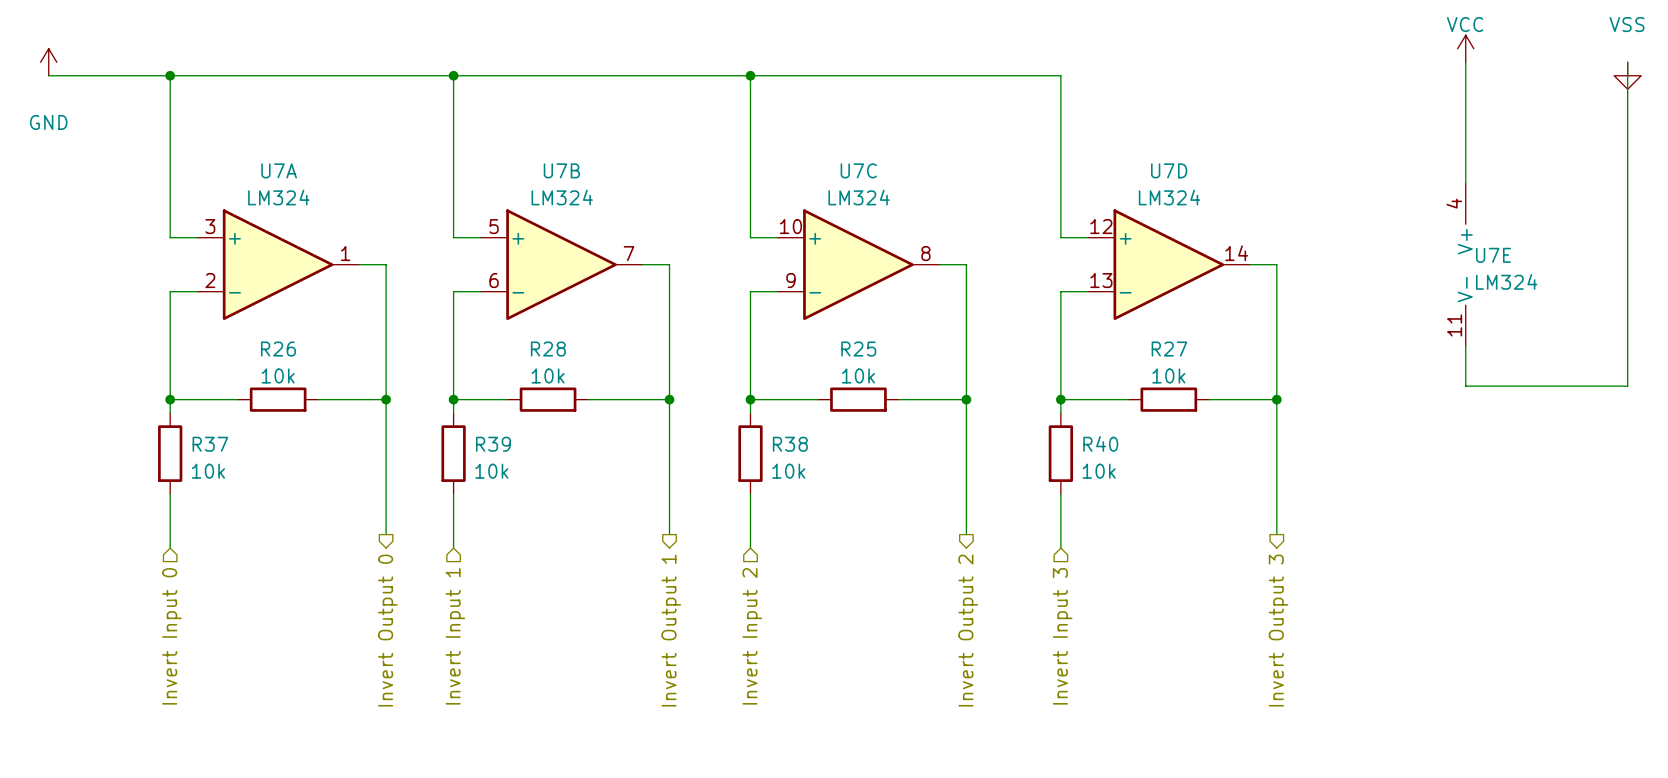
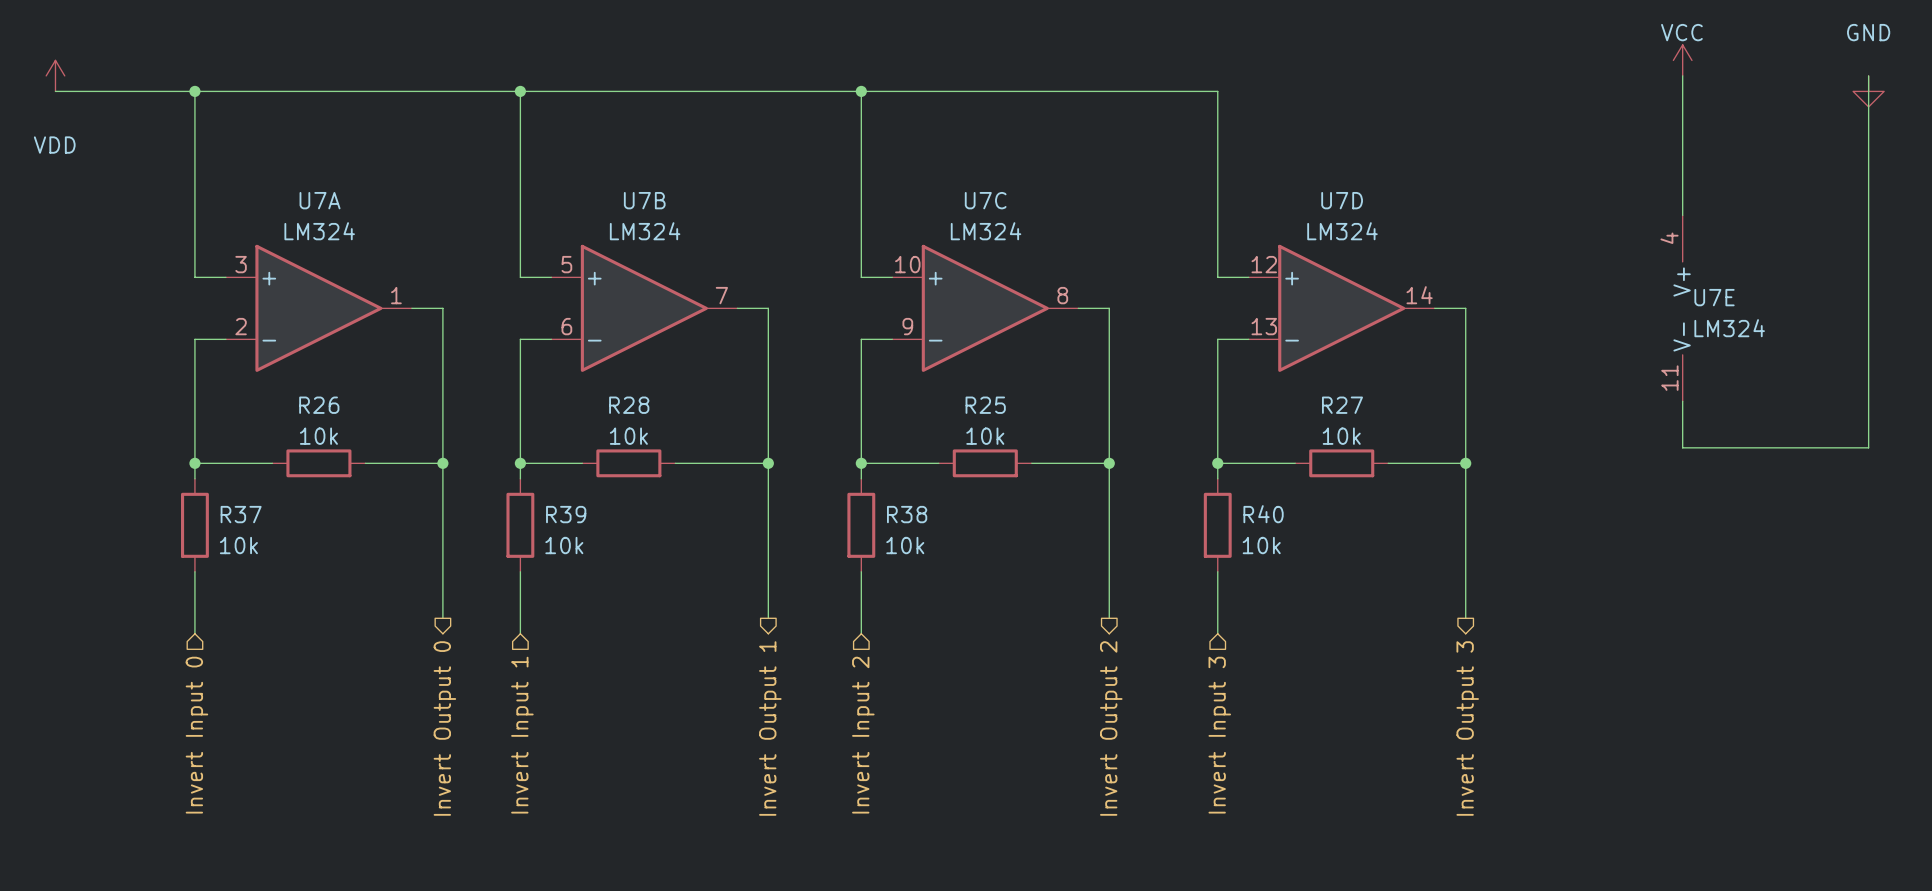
power symbol: GND (48, 62) -> VDD (55, 75)
power symbol: VSS (1627, 75) -> GND (1868, 91)

